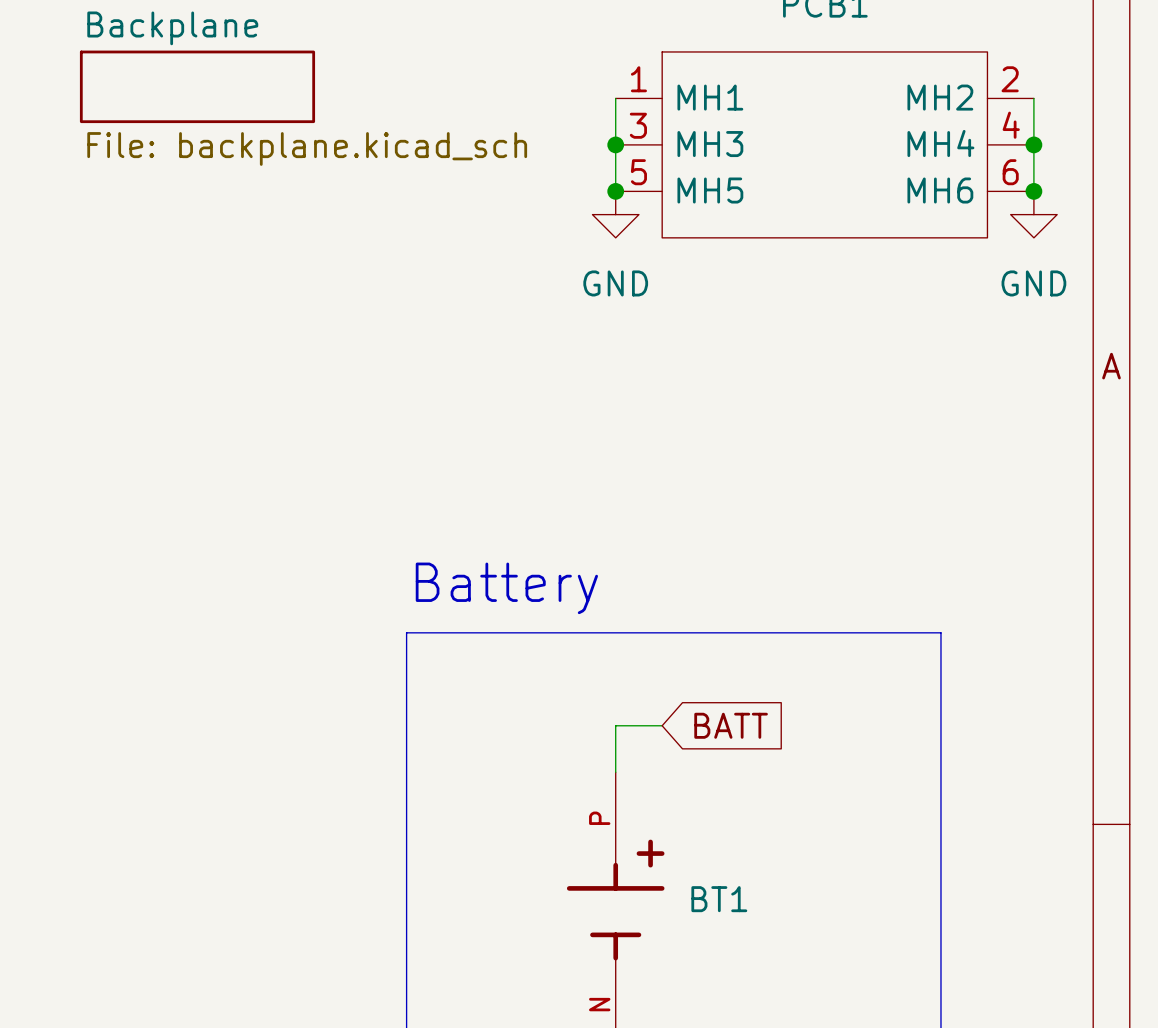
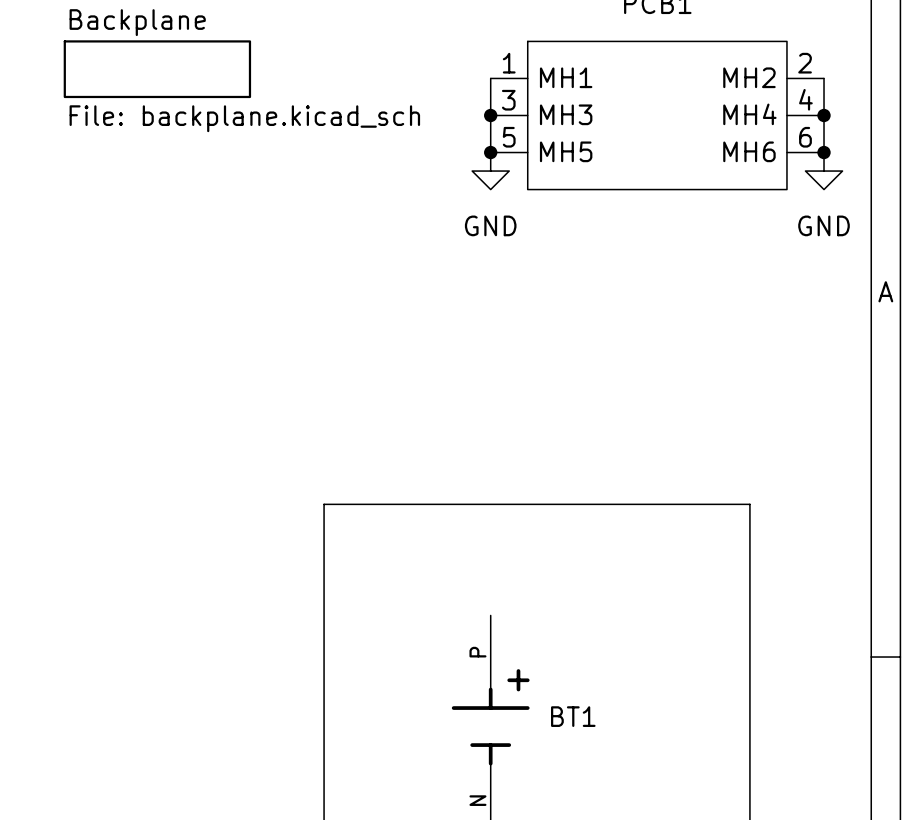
text: Battery (506, 588) -> none
wire: (662, 725) (615, 725) (615, 772) -> none
global label: BATT (731, 725) -> none

